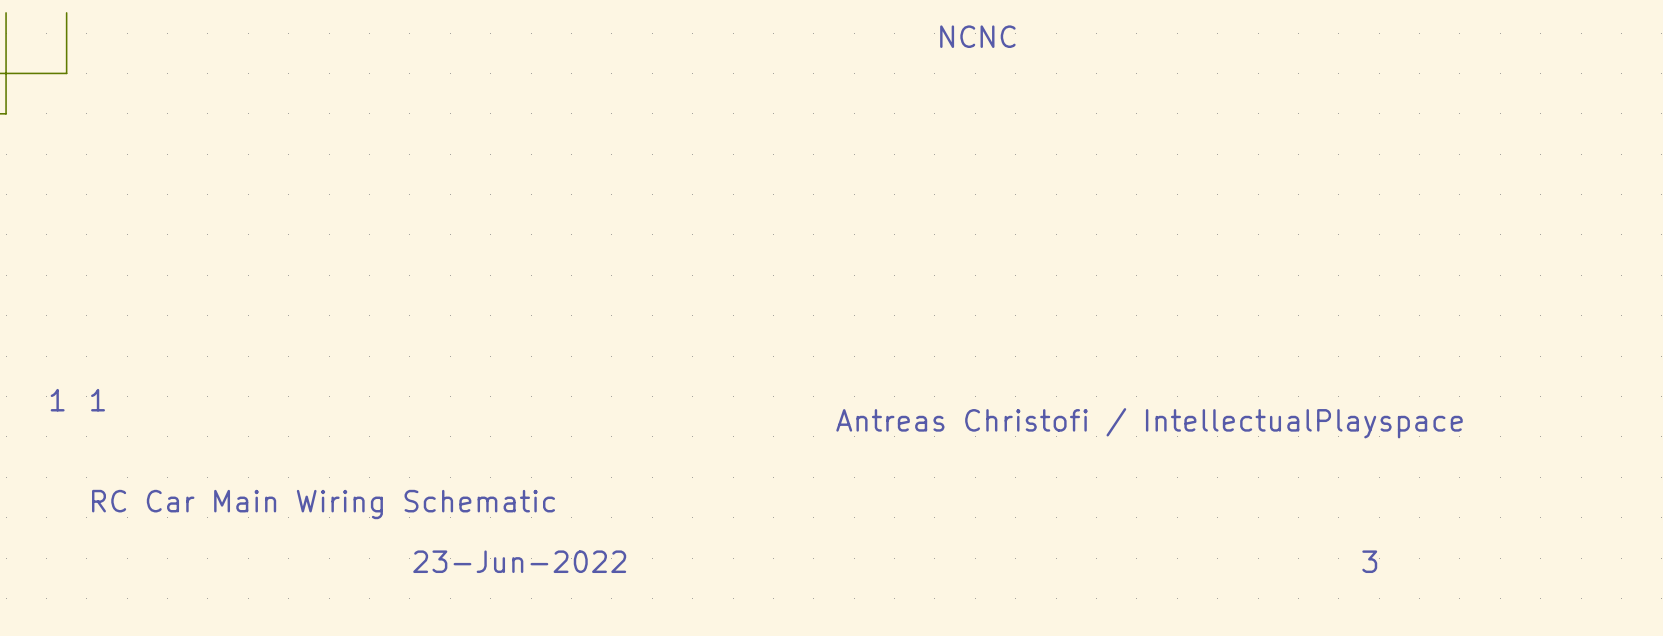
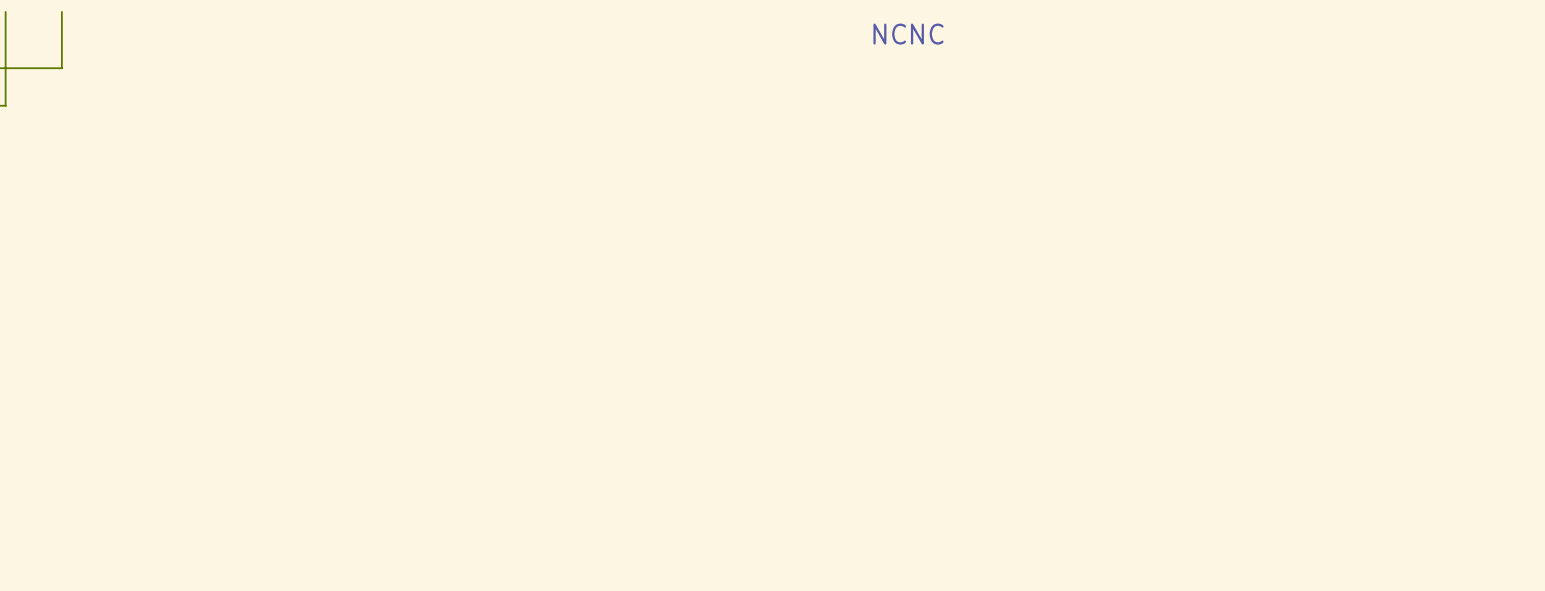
text: 1 (57, 400) -> none
text: 1 (98, 400) -> none
text: Antreas Christofi / IntellectualPlayspace (1149, 423) -> none
text: RC Car Main Wiring Schematic (323, 504) -> none
text: 23-Jun-2022 (519, 561) -> none
text: 3 (1369, 561) -> none

